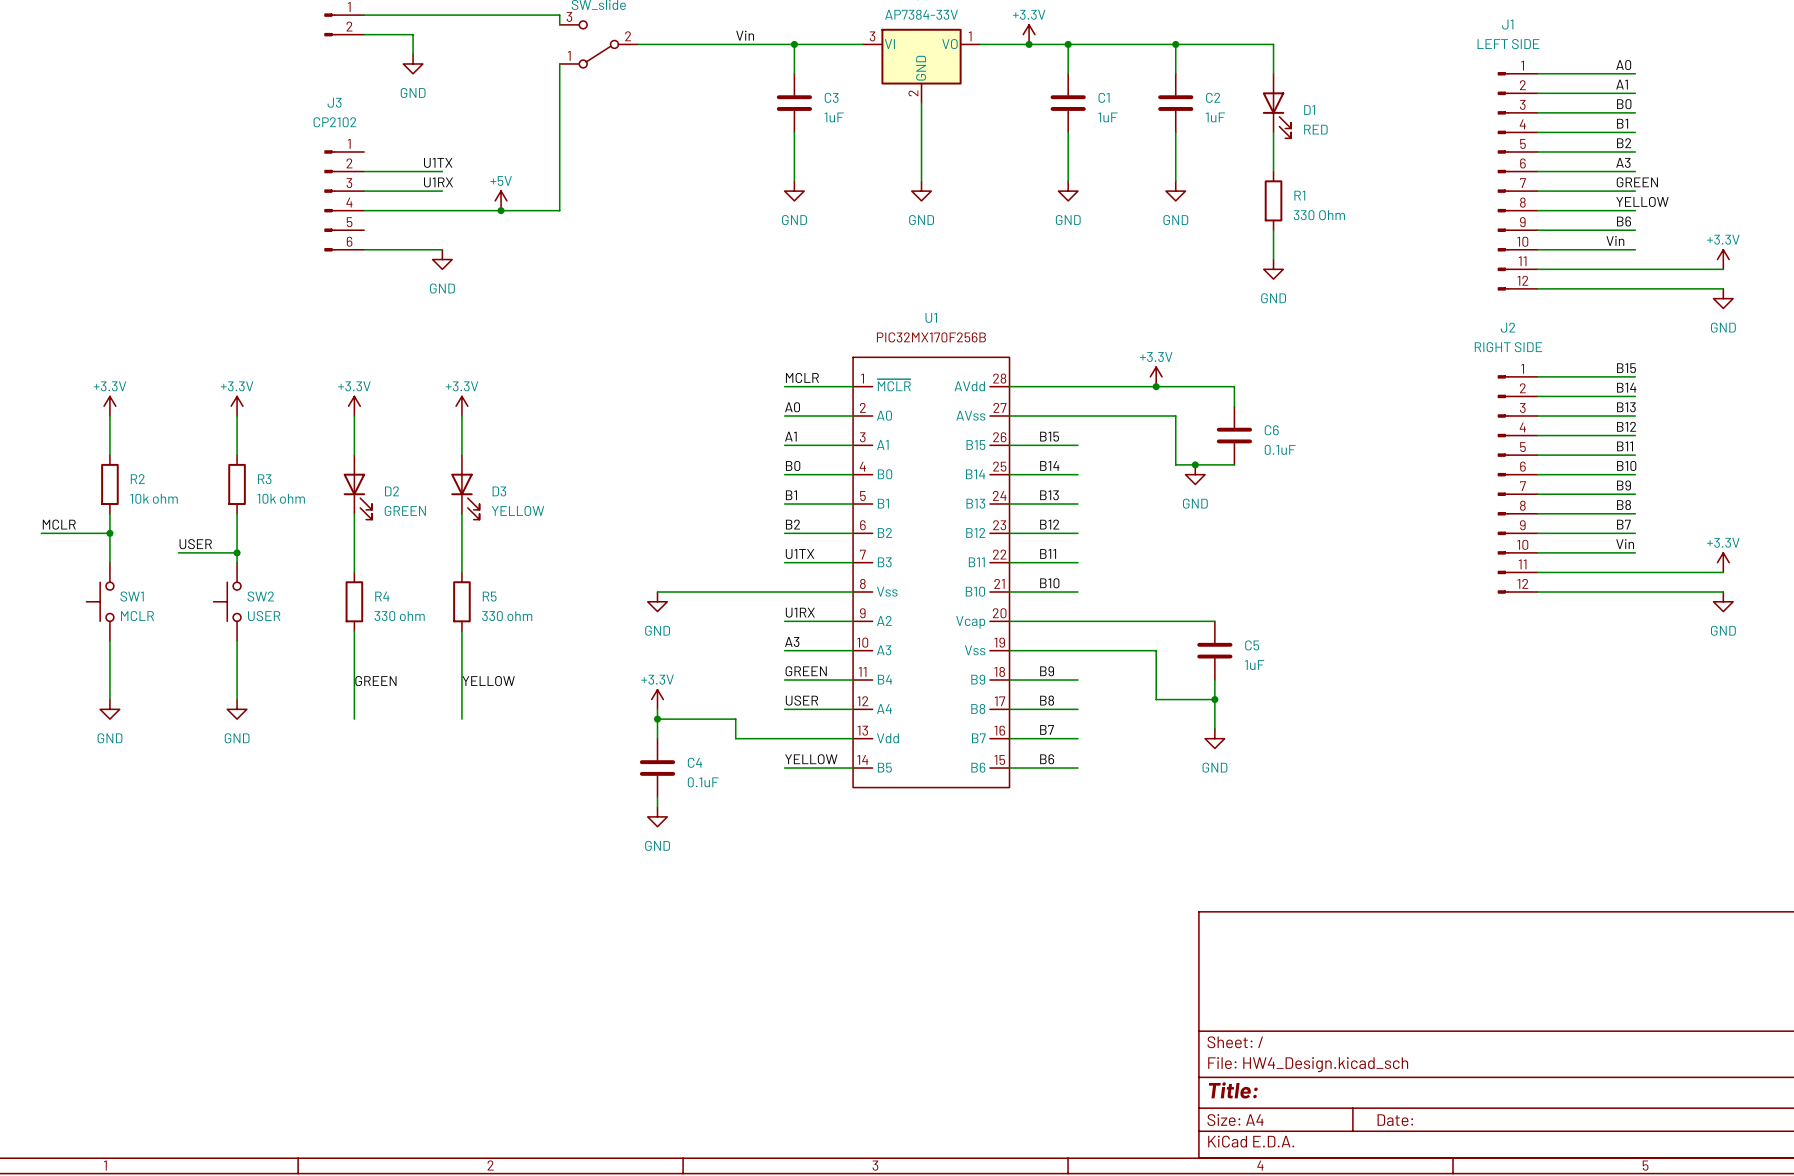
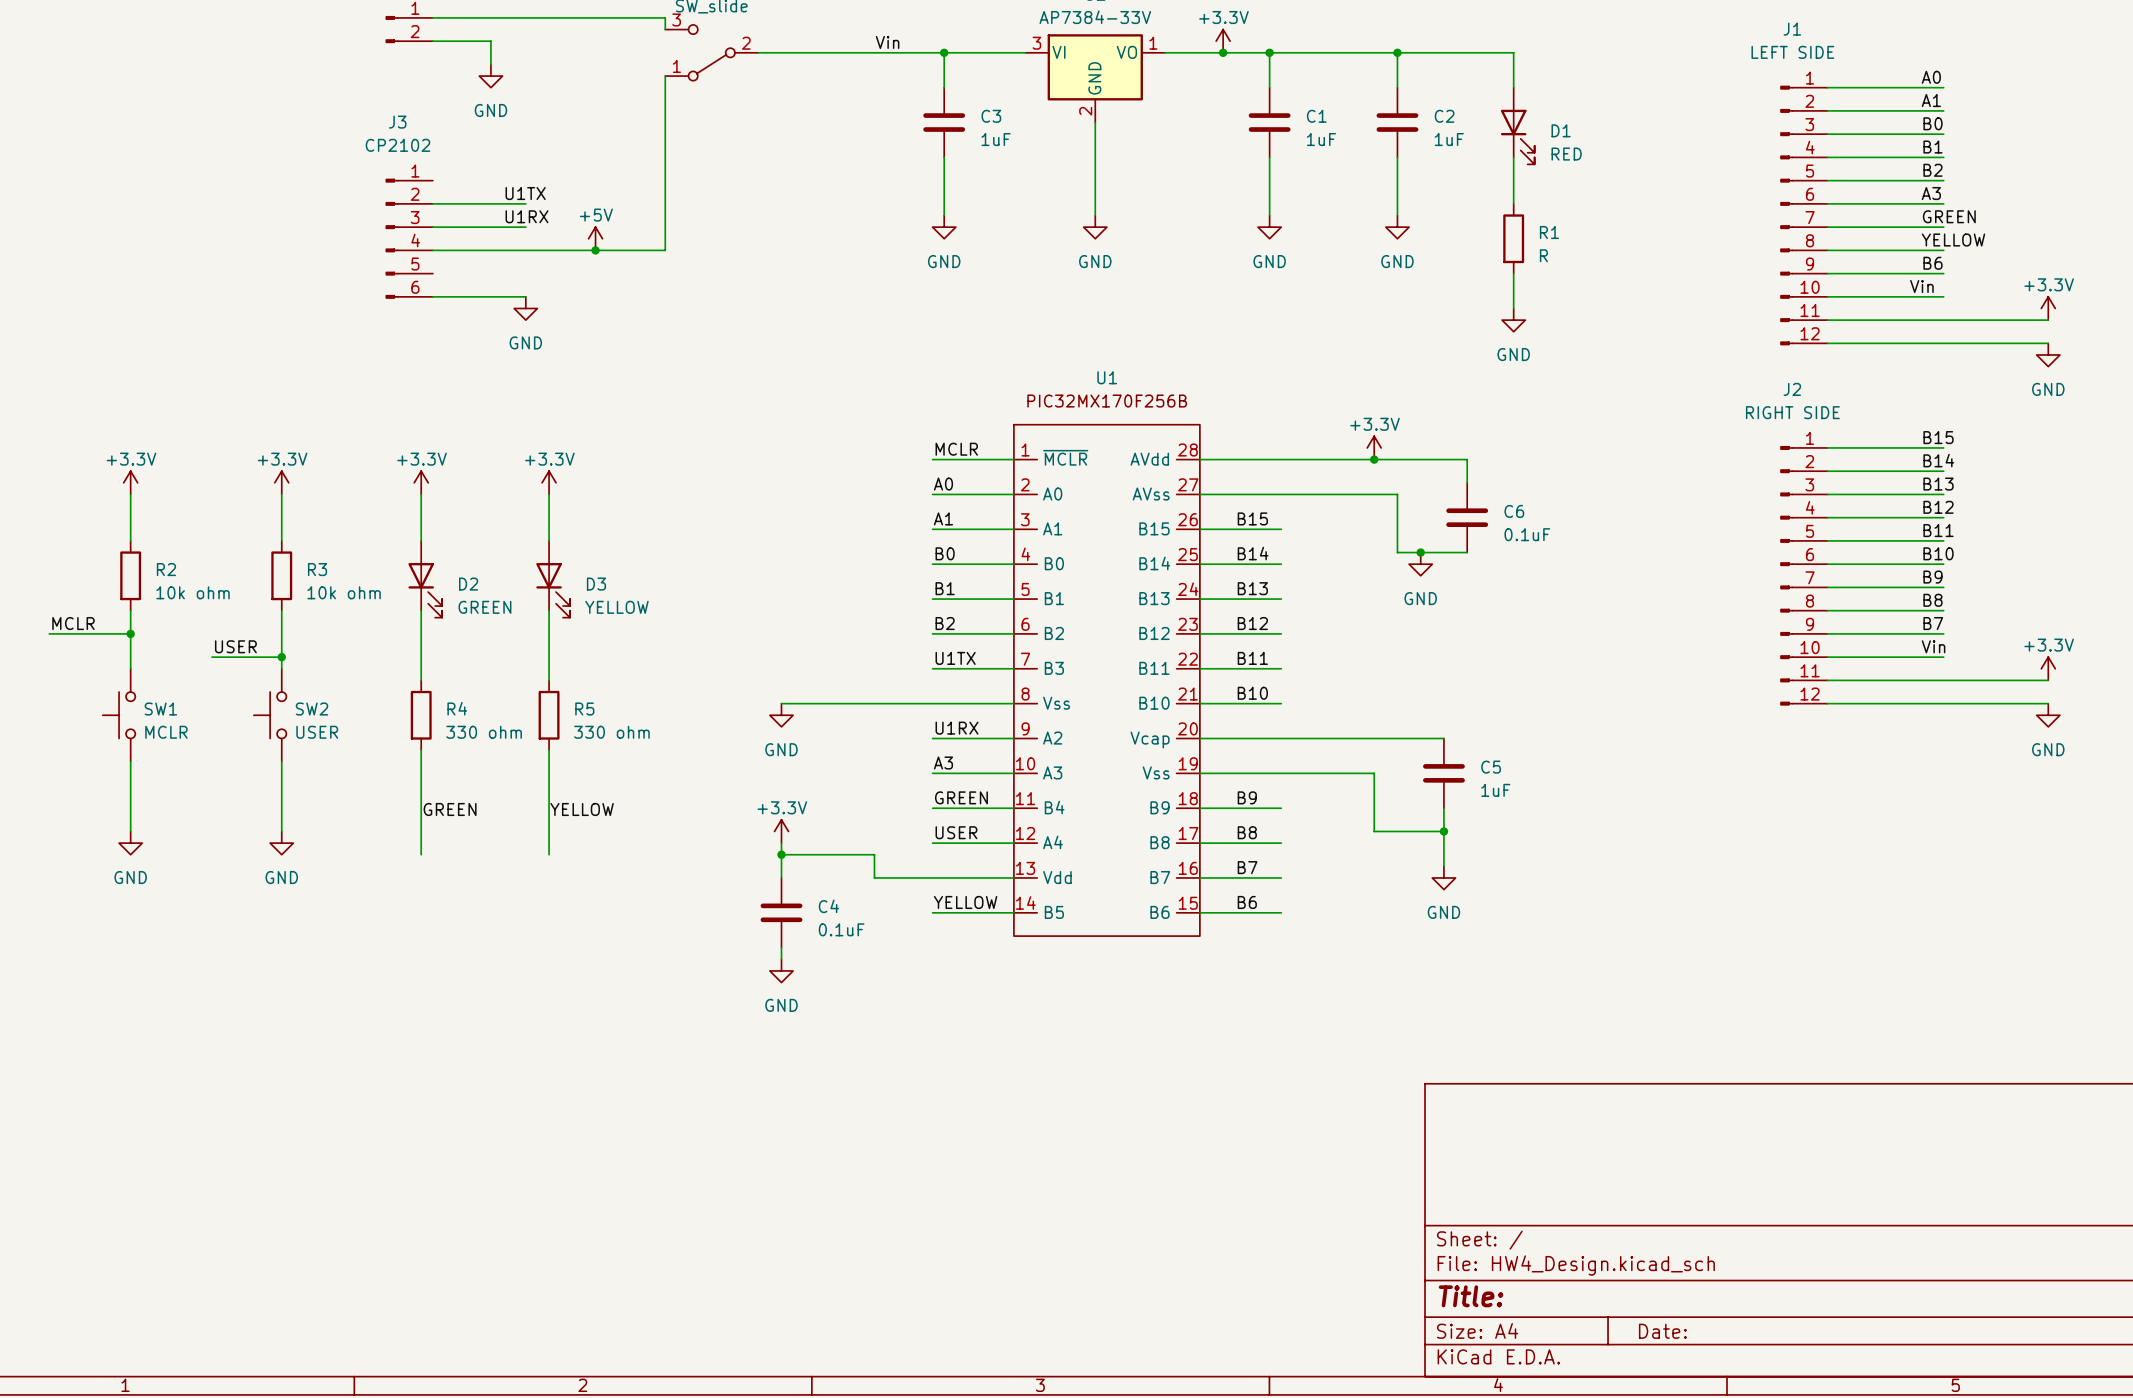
R1 value: 330 Ohm (1319, 215) -> R (1543, 255)

